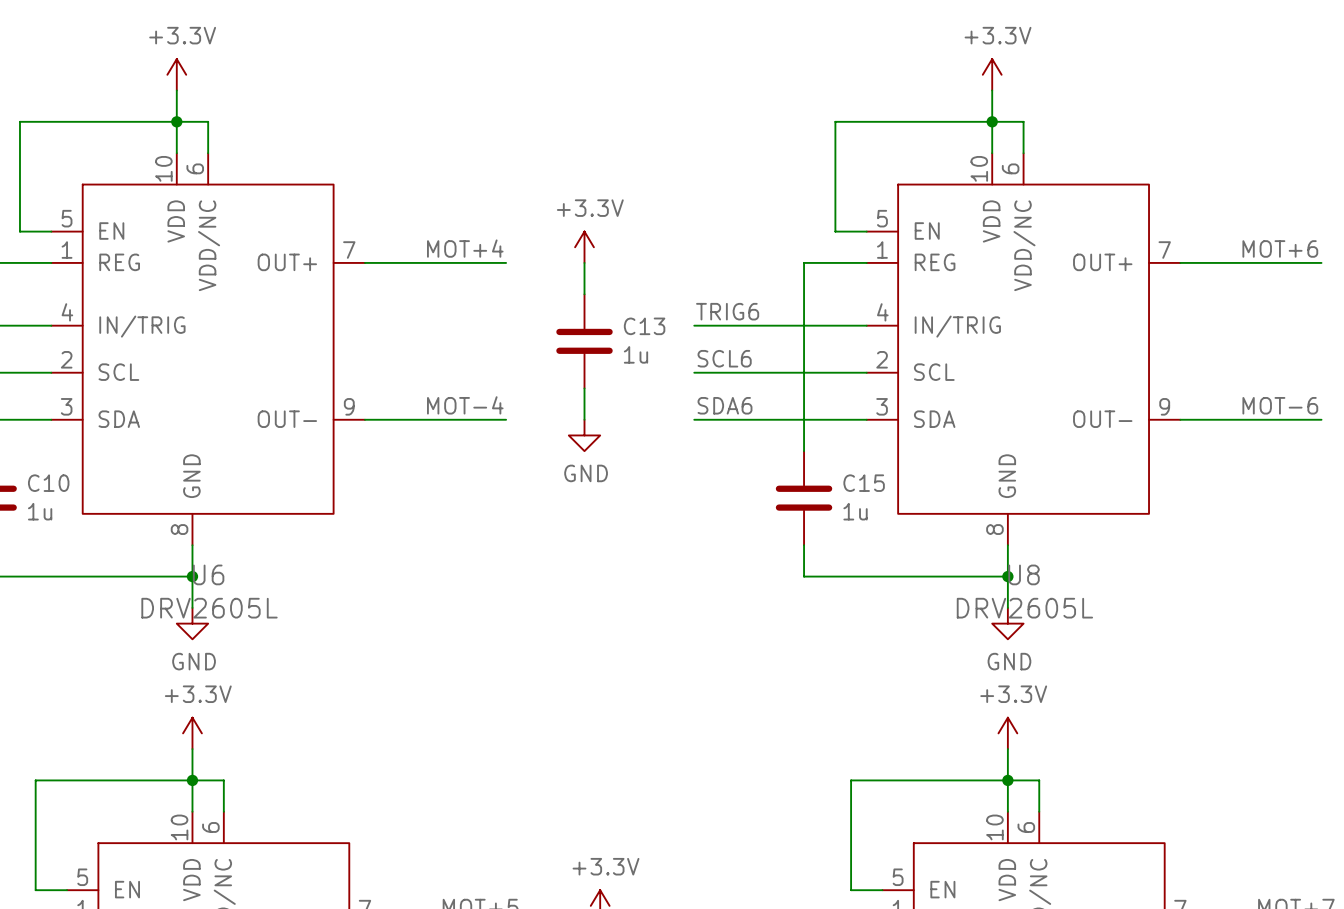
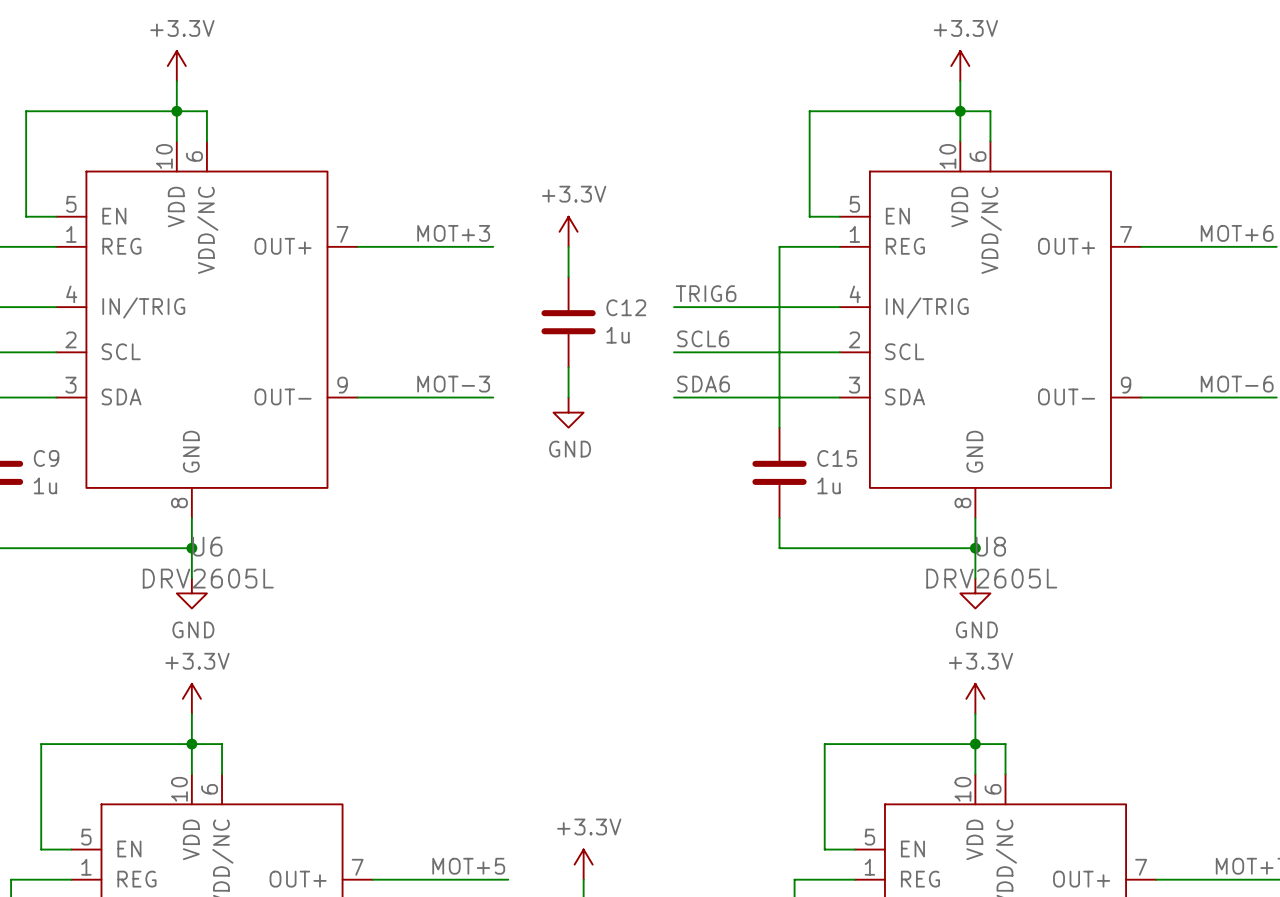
label: MOT+4 (465, 248) -> MOT+3 (453, 233)
C13 name: C13 (644, 326) -> C12 (626, 307)
label: MOT-4 (465, 405) -> MOT-3 (453, 384)
C10 name: C10 (48, 483) -> C9 (46, 458)

